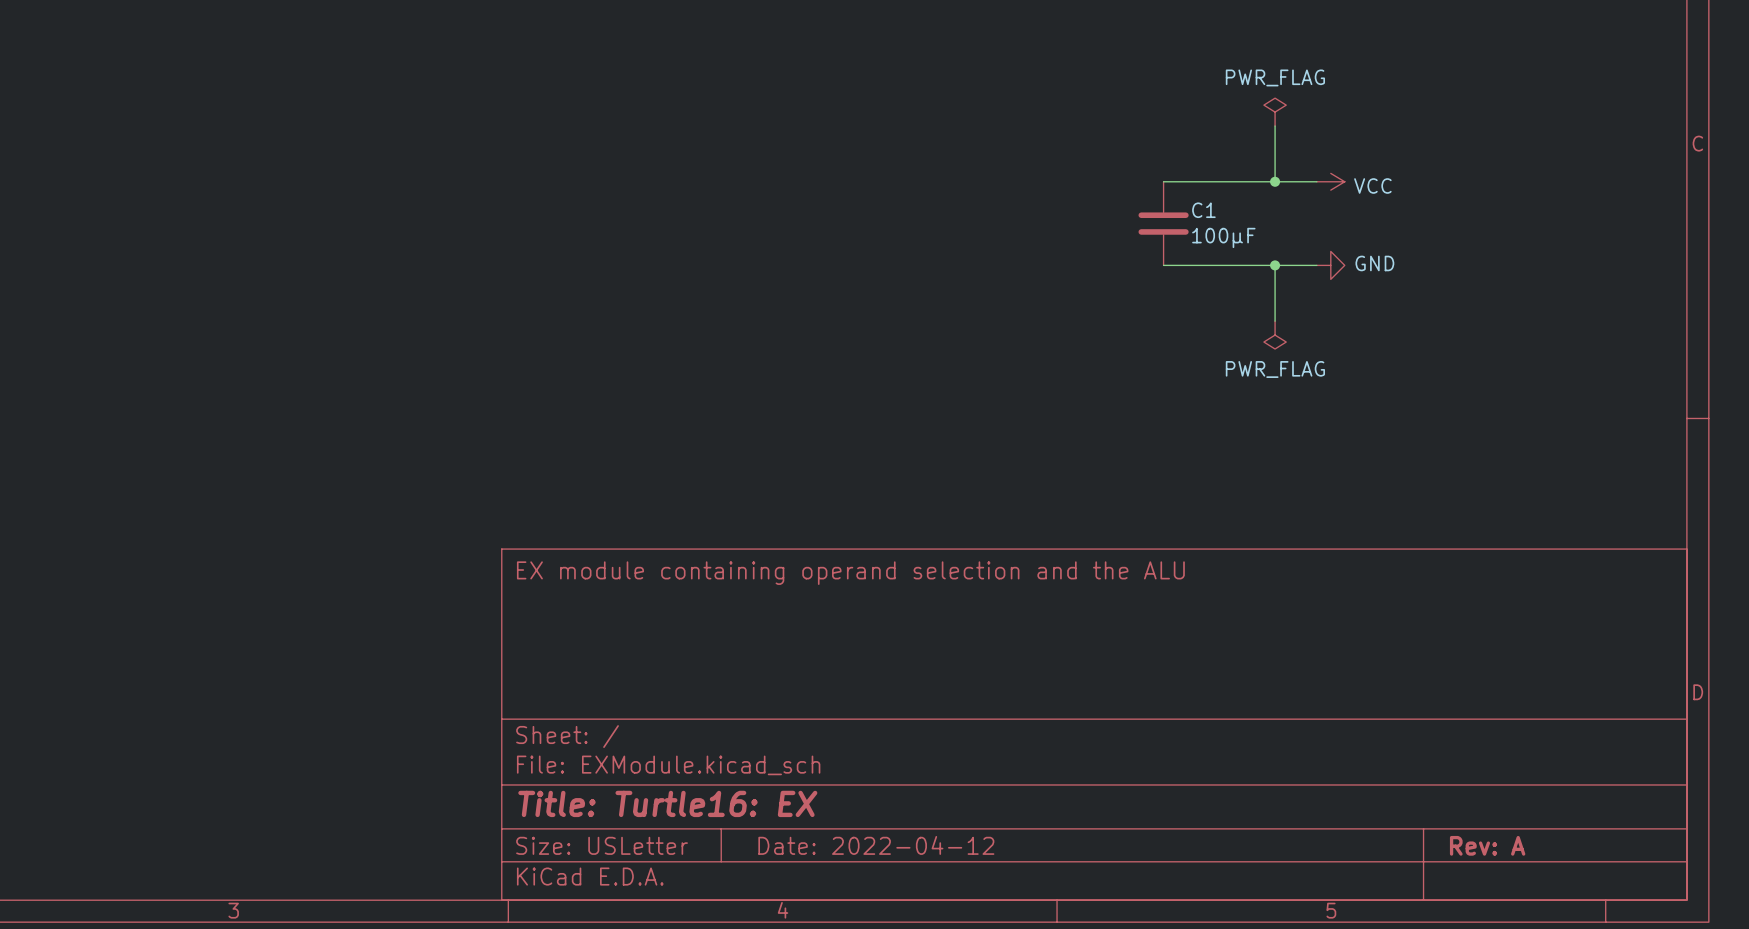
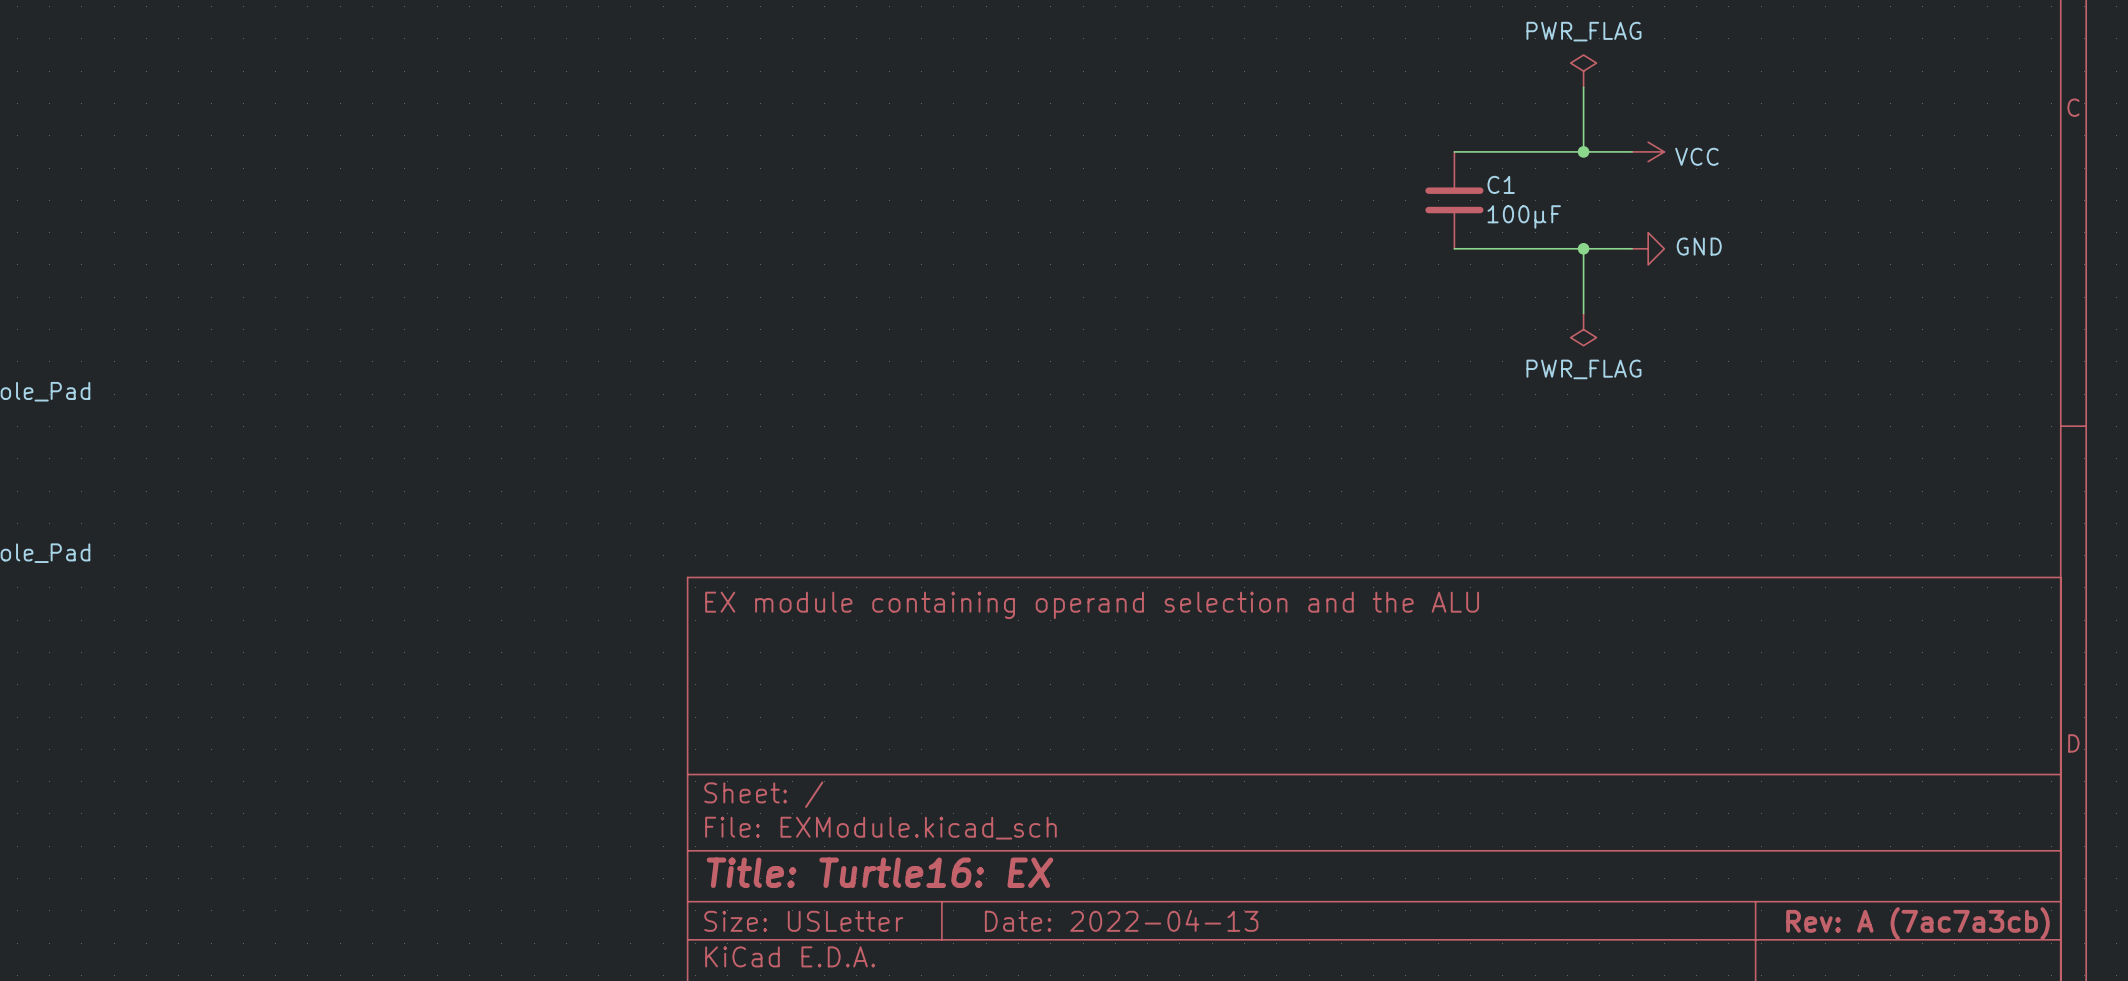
title block: Date: 2022-04-12 (876, 845) -> Date: 2022-04-13 (1121, 920)
title block: Rev: A (1487, 845) -> Rev: A (7ac7a3cb) (1917, 923)

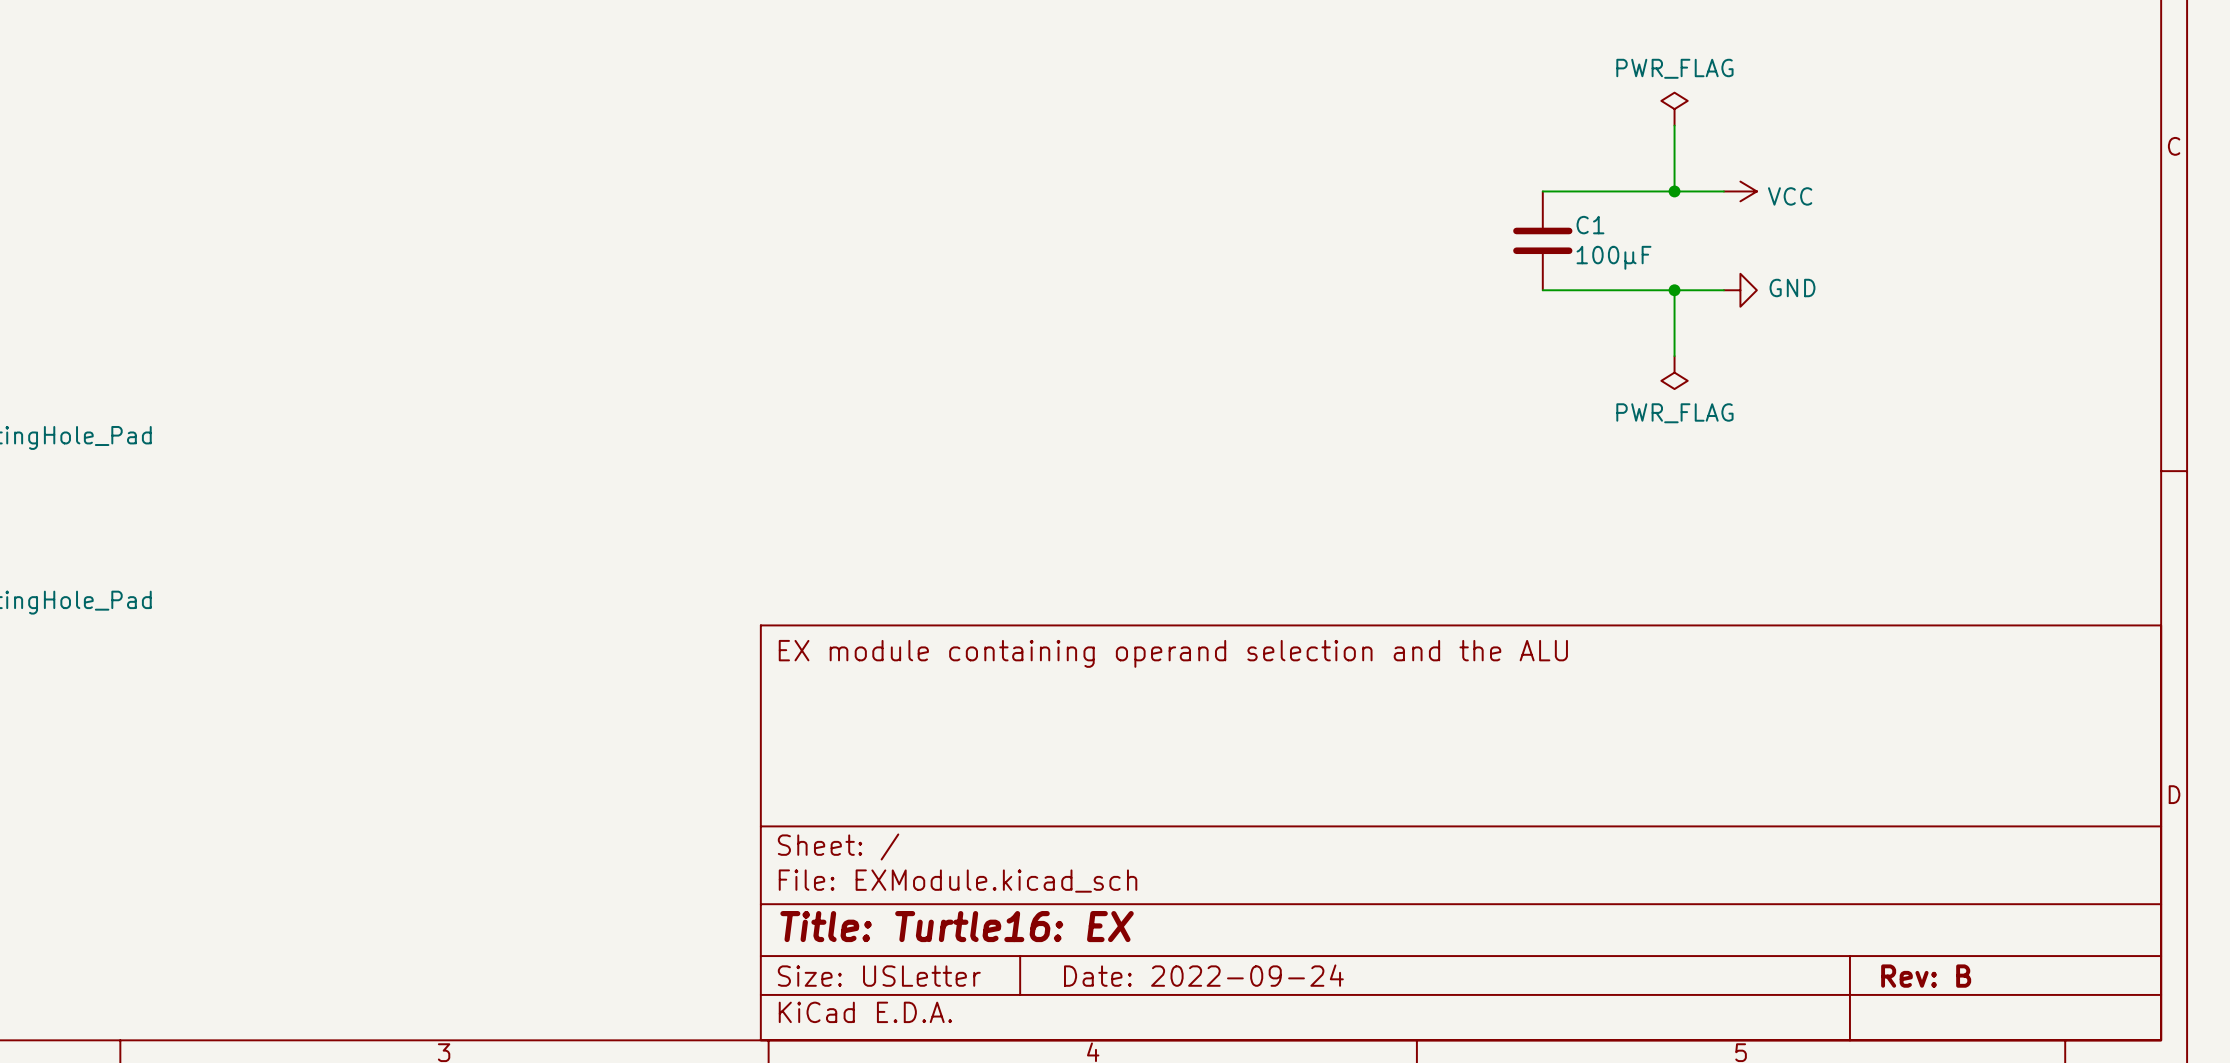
title block: Date: 2022-04-13 (1121, 920) -> Date: 2022-09-24 (1203, 975)
title block: Rev: A (7ac7a3cb) (1917, 923) -> Rev: B (1926, 976)

